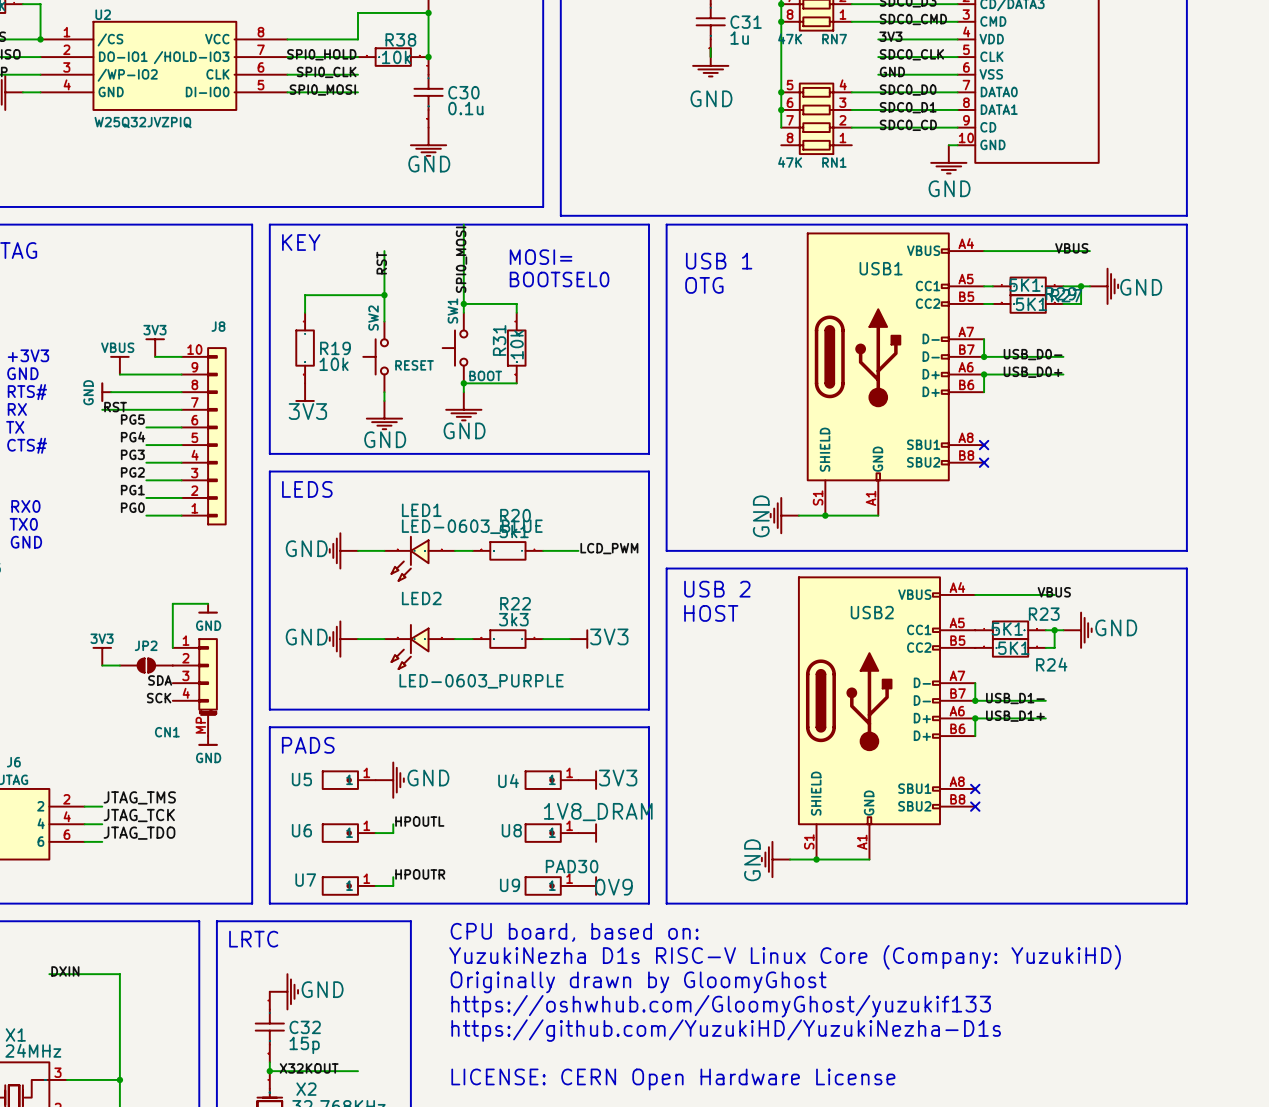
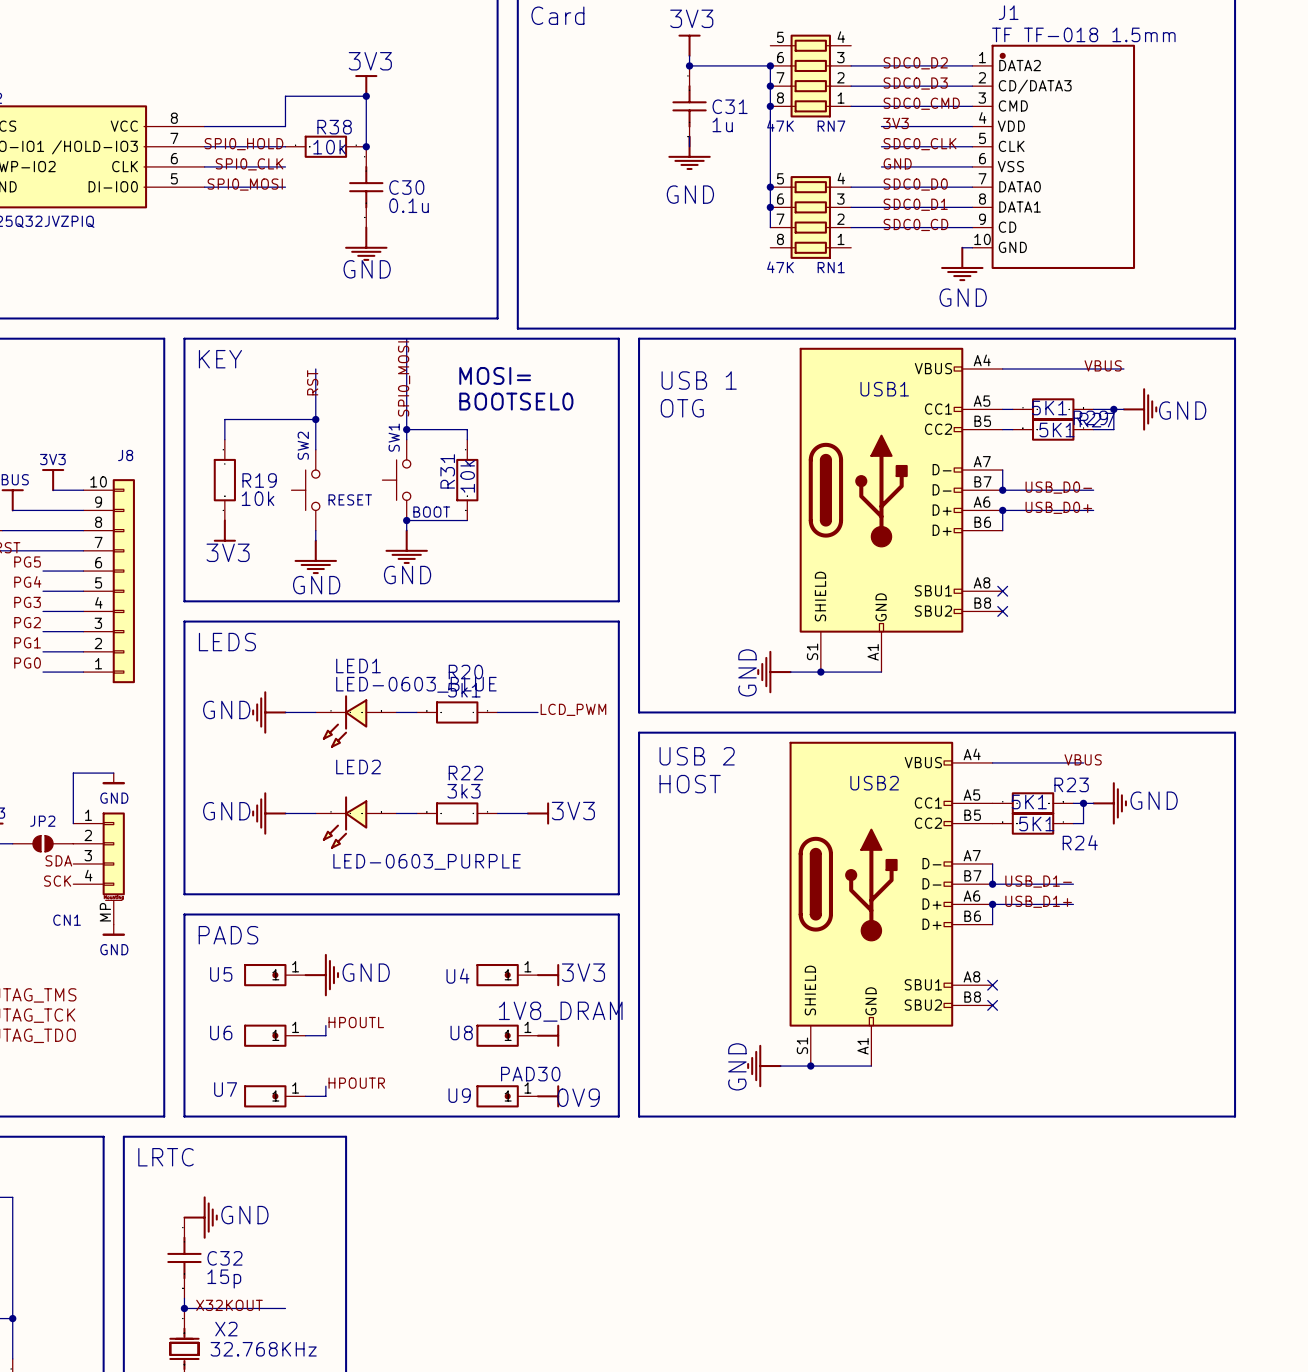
text: CPU board, based on: (574, 932) -> none
text: YuzukiNezha D1s RISC-V Linux Core (Company: YuzukiHD) (785, 957) -> none
text: Originally drawn by GloomyGhost (638, 982) -> none
text: https://oshwhub.com/GloomyGhost/yuzukif133 (721, 1006) -> none
text: https://github.com/YuzukiHD/YuzukiNezha-D1s (726, 1030) -> none
text: LICENSE: CERN Open Hardware License (673, 1079) -> none

